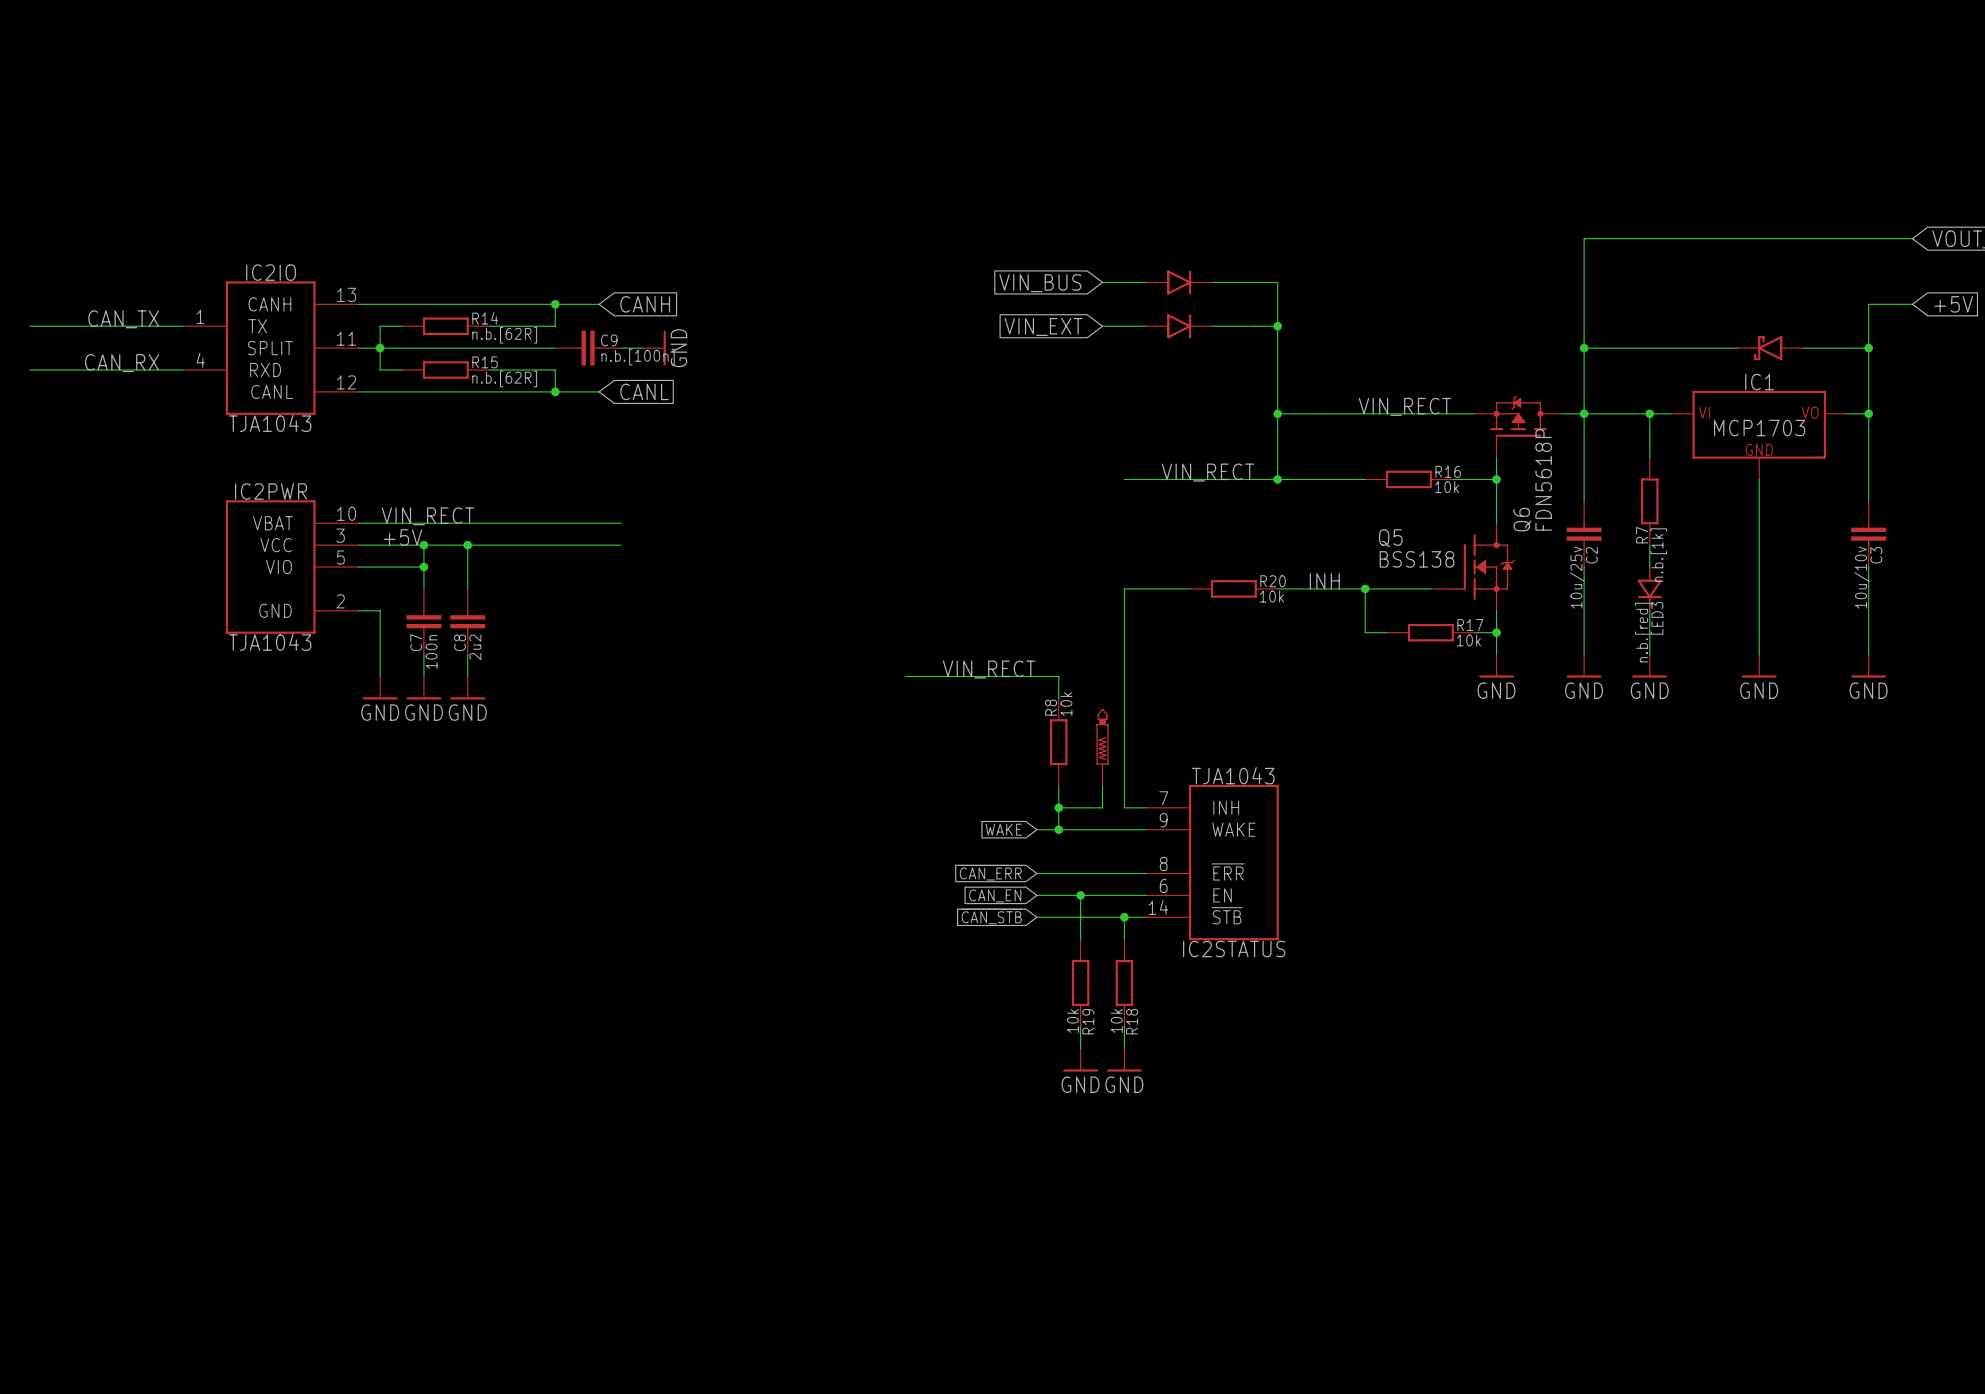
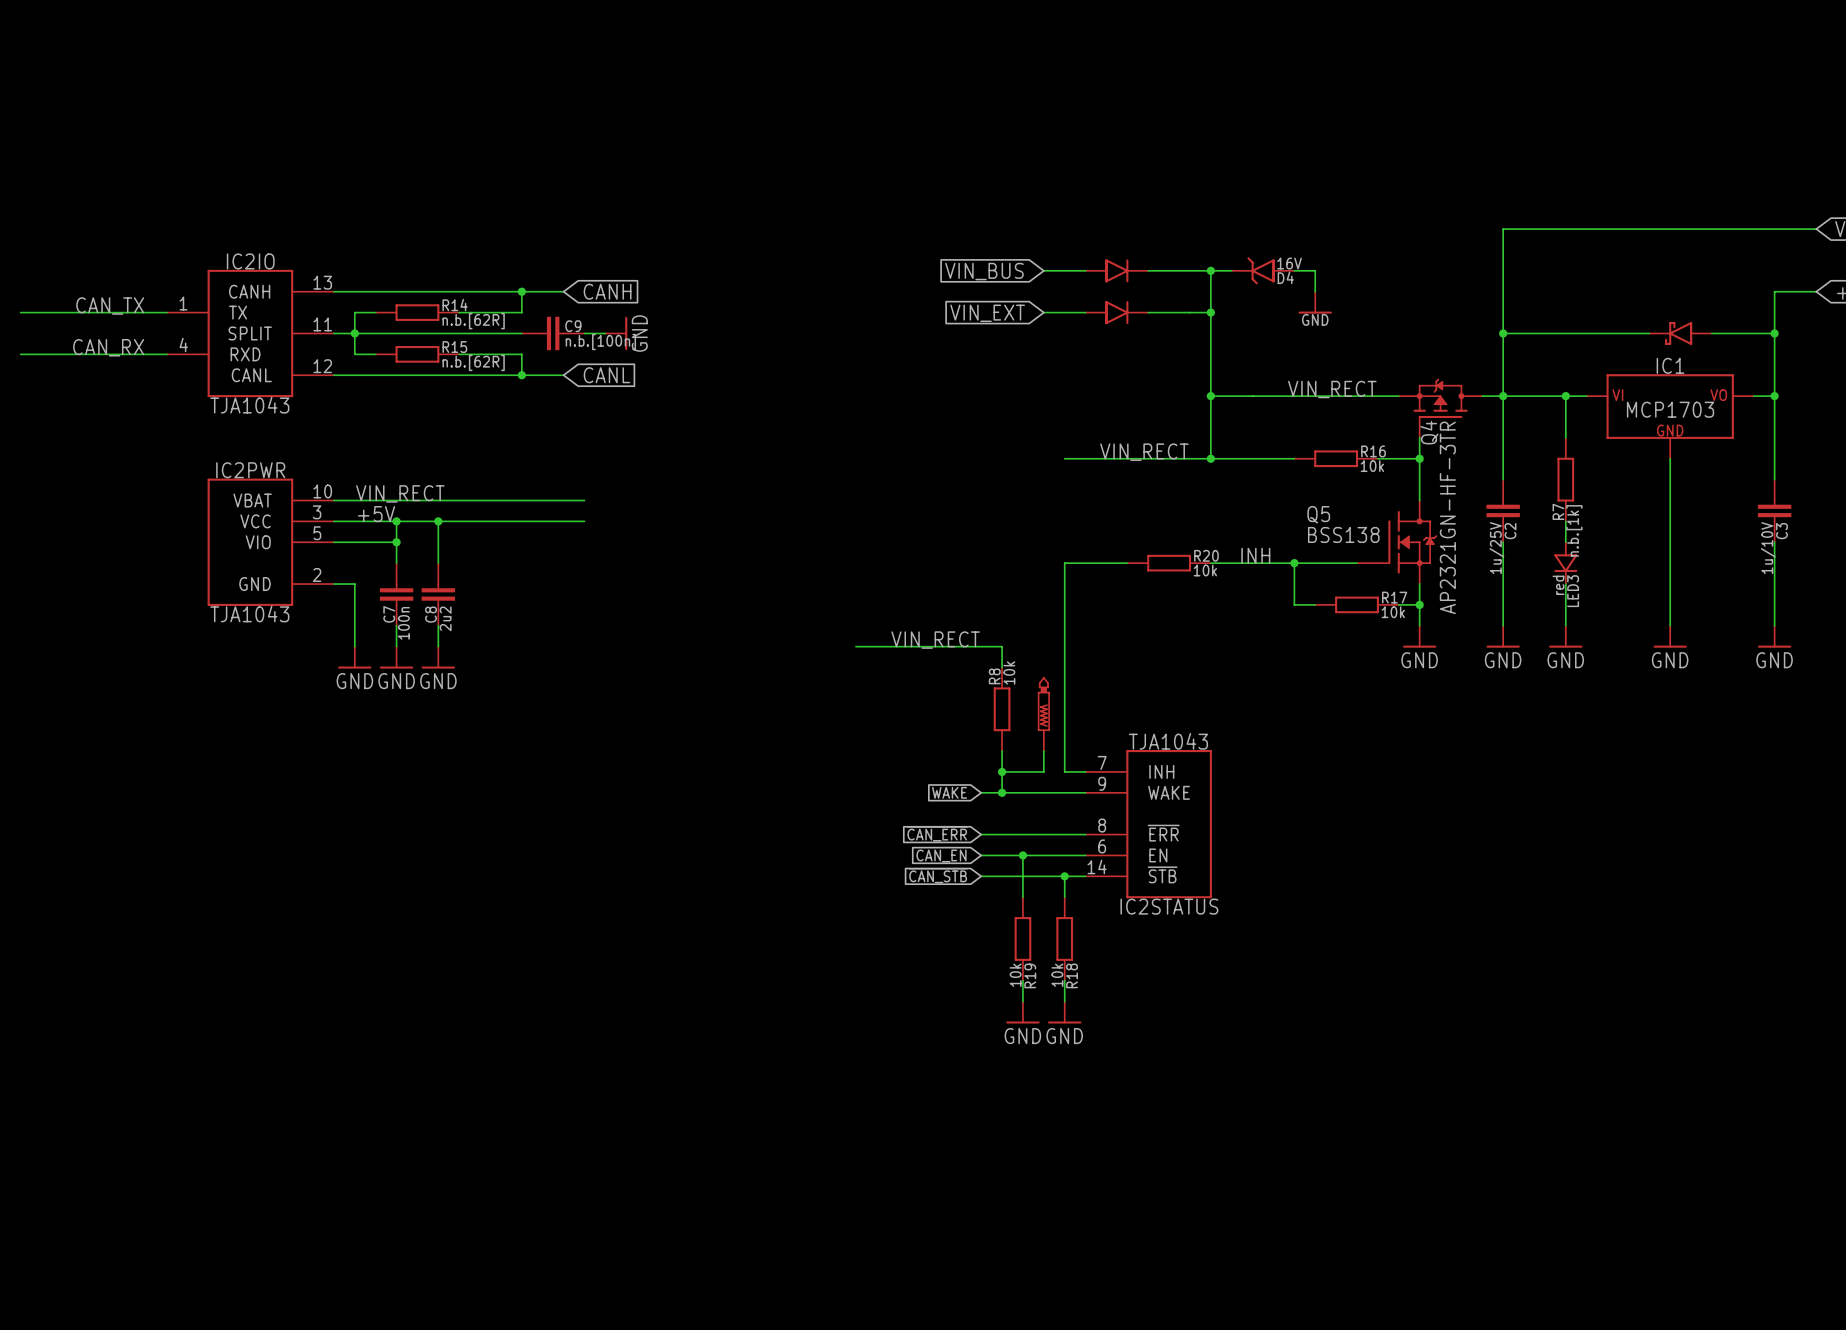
wire: none -> (1210, 270) (1231, 270)
junction: none -> (1210, 270)
D4: none -> 16V (1263, 270)
wire: none -> (1294, 270) (1315, 270) (1315, 291)
power symbol: none -> GND (1315, 302)
Q6 value: FDN5618P (1543, 479) -> AP2321GN-HF-3TR (1447, 517)
Q6 name: Q6 (1522, 519) -> Q4 (1429, 432)
C2 value: 10u/25v (1577, 577) -> 1u/25V (1496, 548)
C3 value: 10u/10v (1862, 577) -> 1u/10V (1768, 548)
LED3 value: n.b.[red] (1643, 632) -> red (1558, 585)

